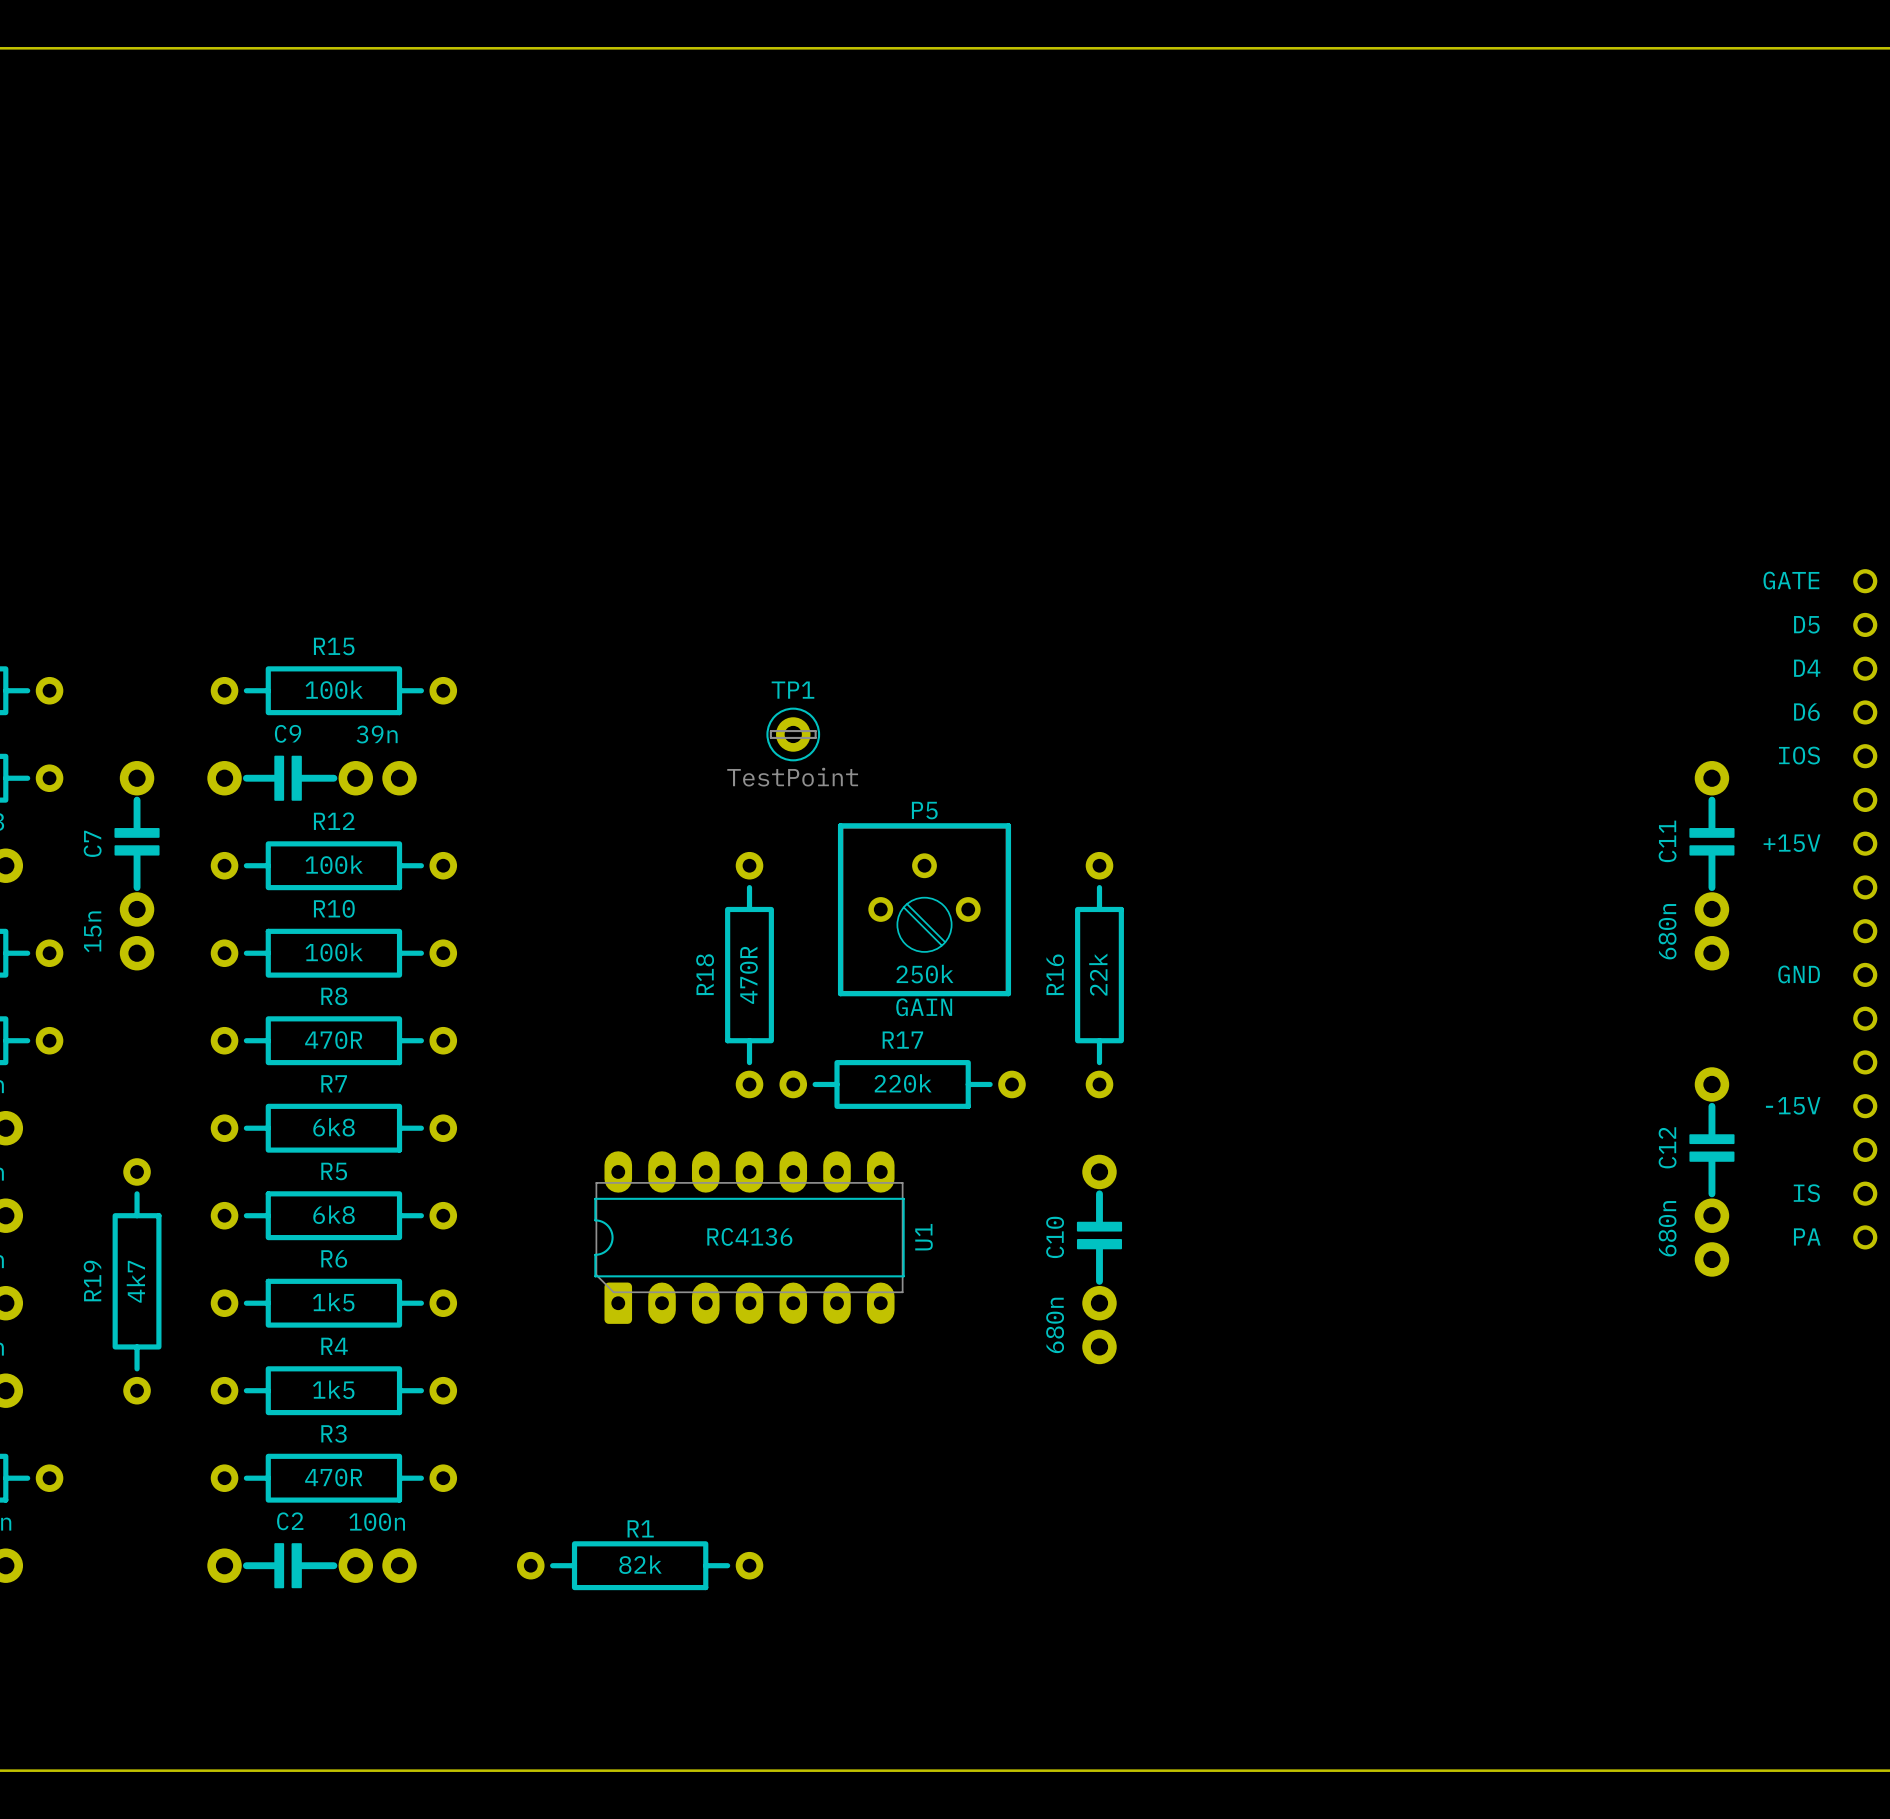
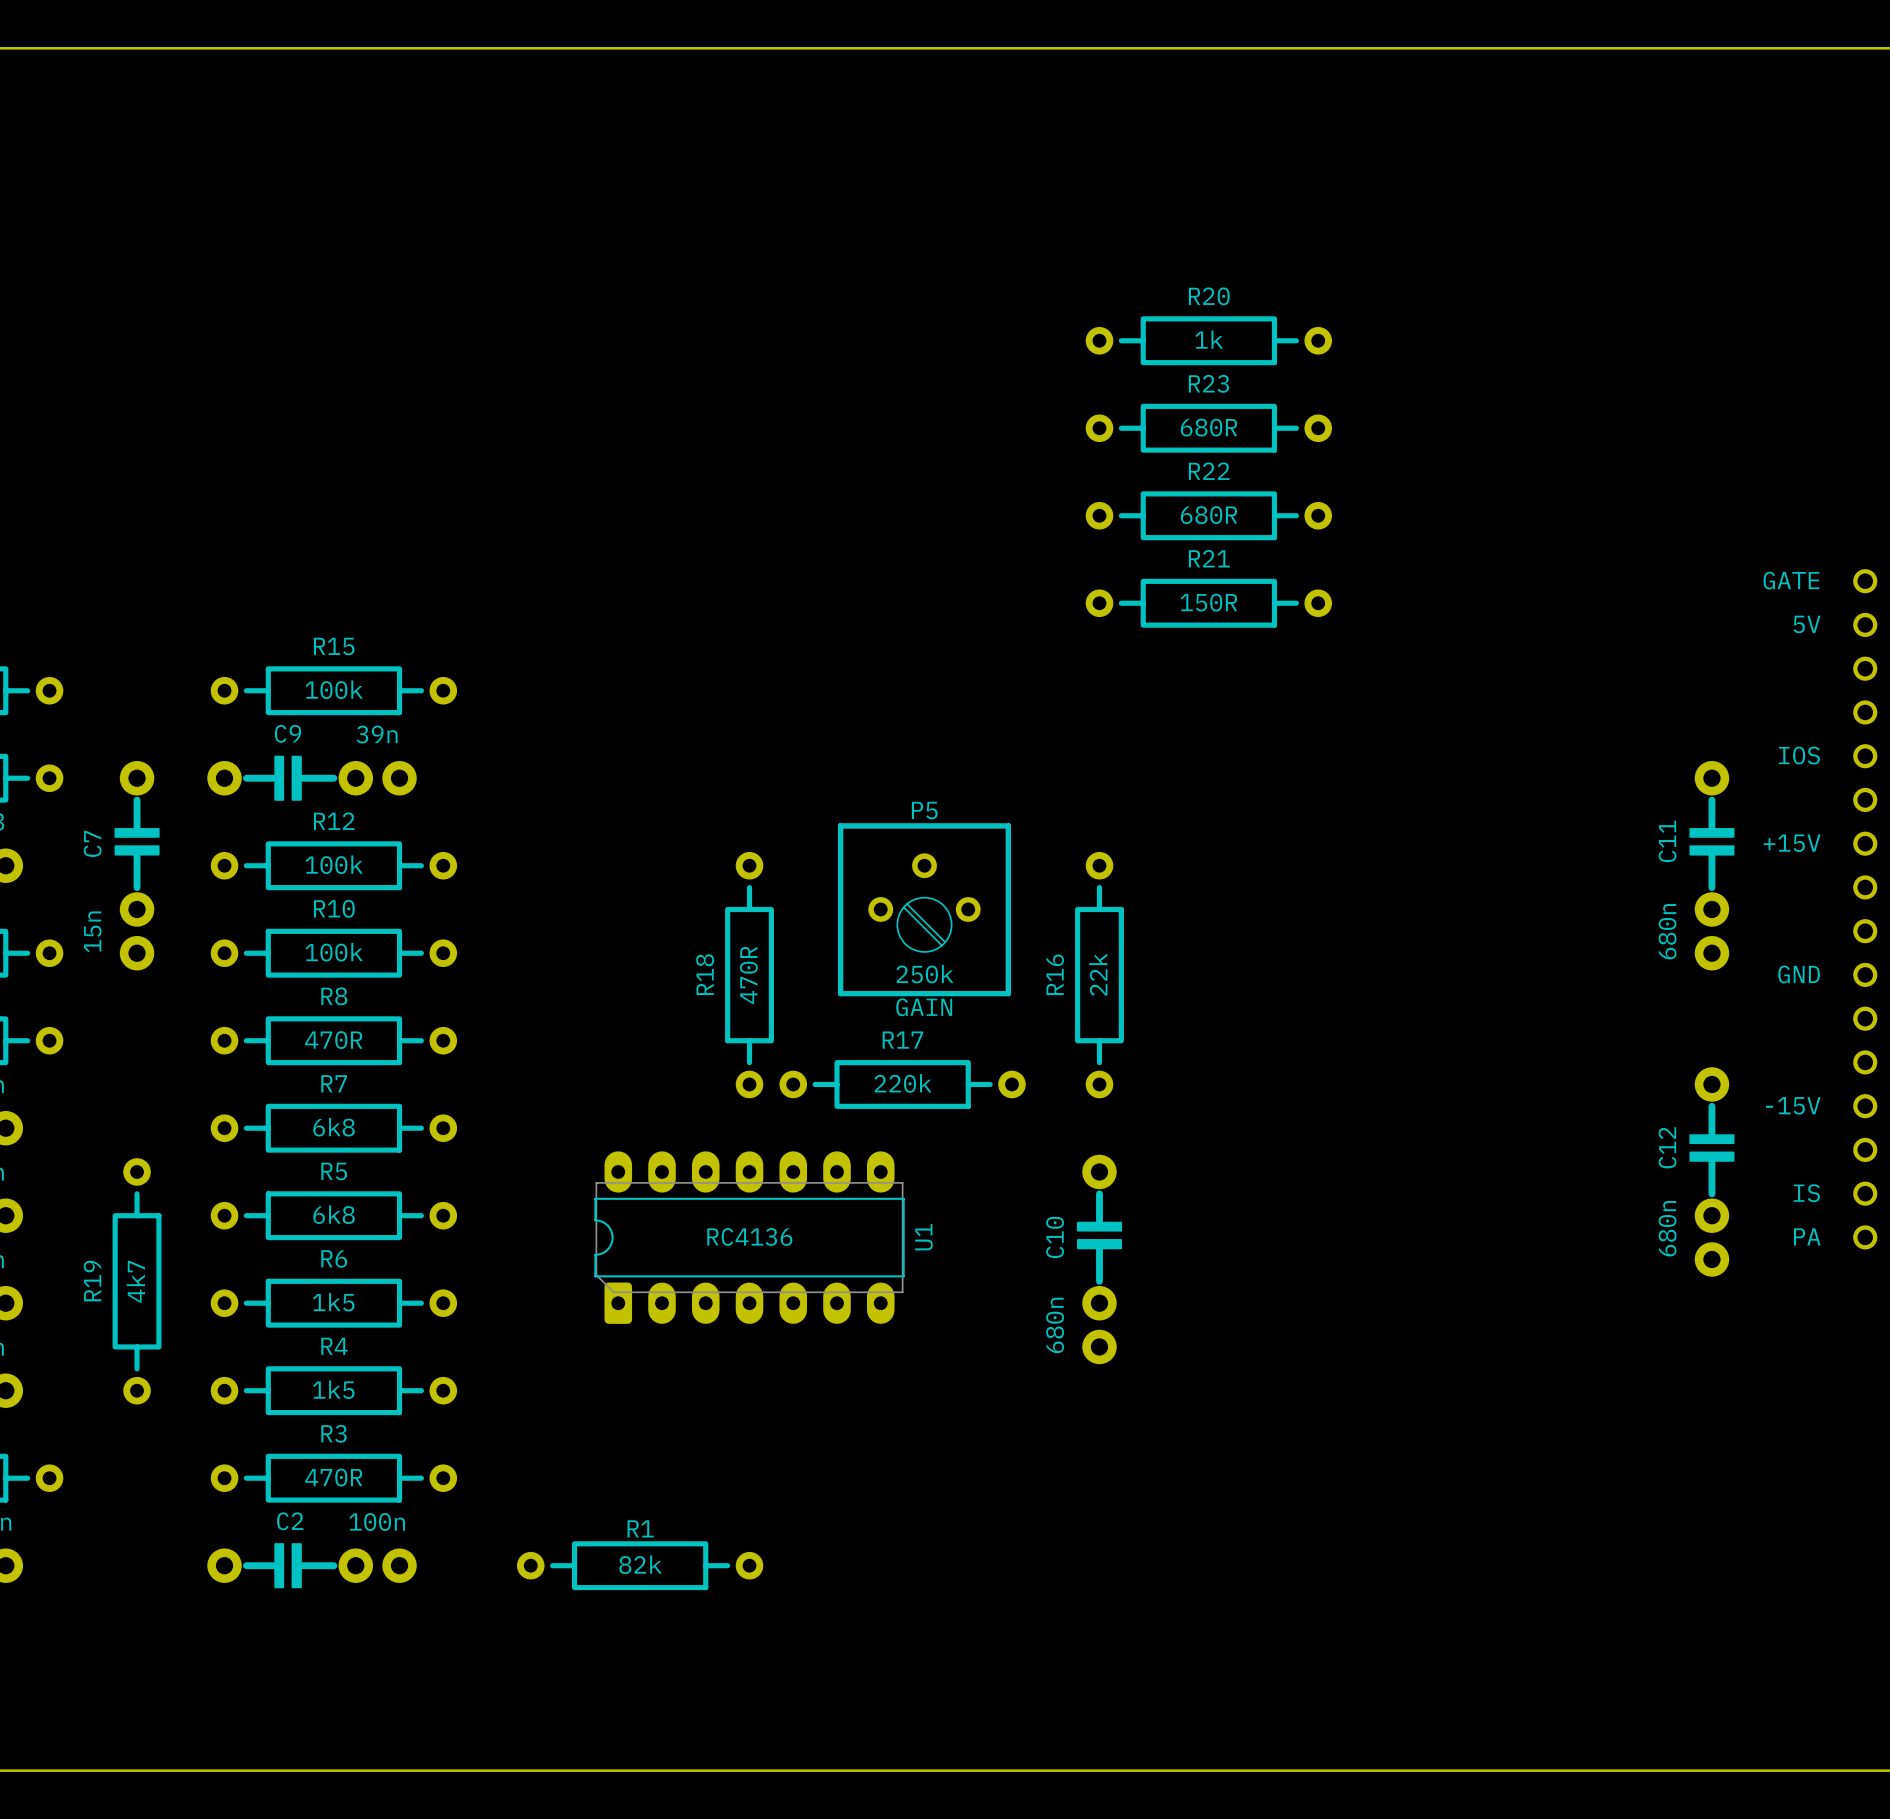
R20: none -> 1k (1208, 340)
R23: none -> 680R (1208, 428)
R22: none -> 680R (1208, 515)
R21: none -> 150R (1208, 603)
text: D5 (1806, 624) -> 5V (1806, 624)
text: D4 (1807, 668) -> none
text: D6 (1806, 712) -> none
TP1: TestPoint (793, 734) -> none

